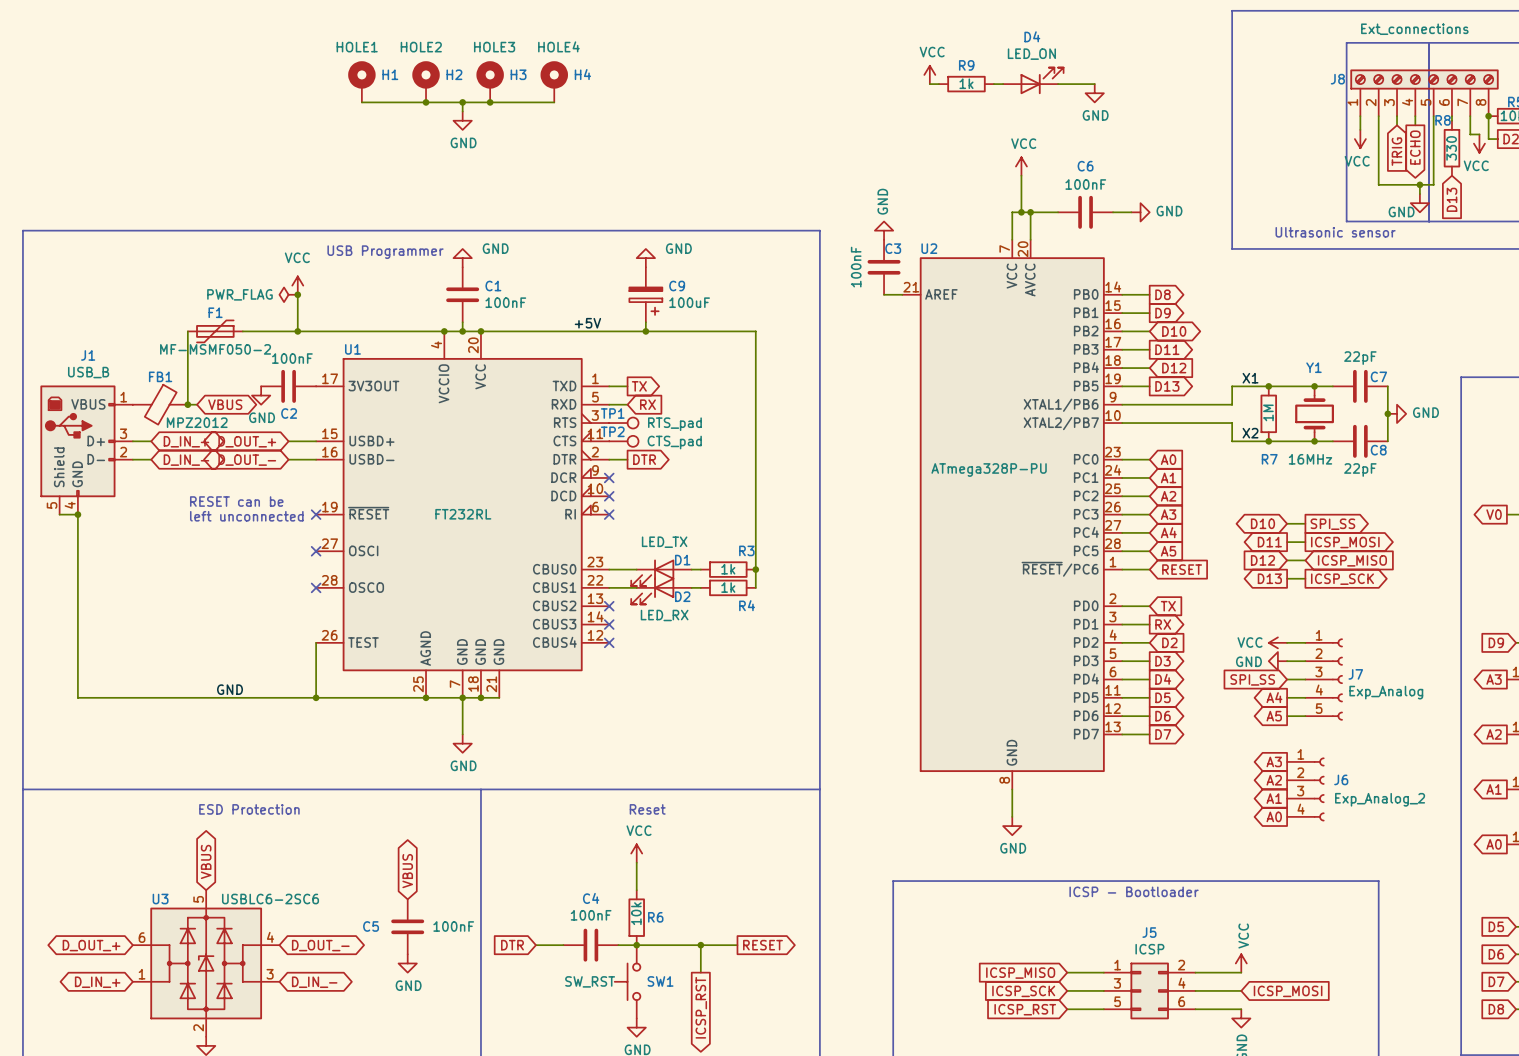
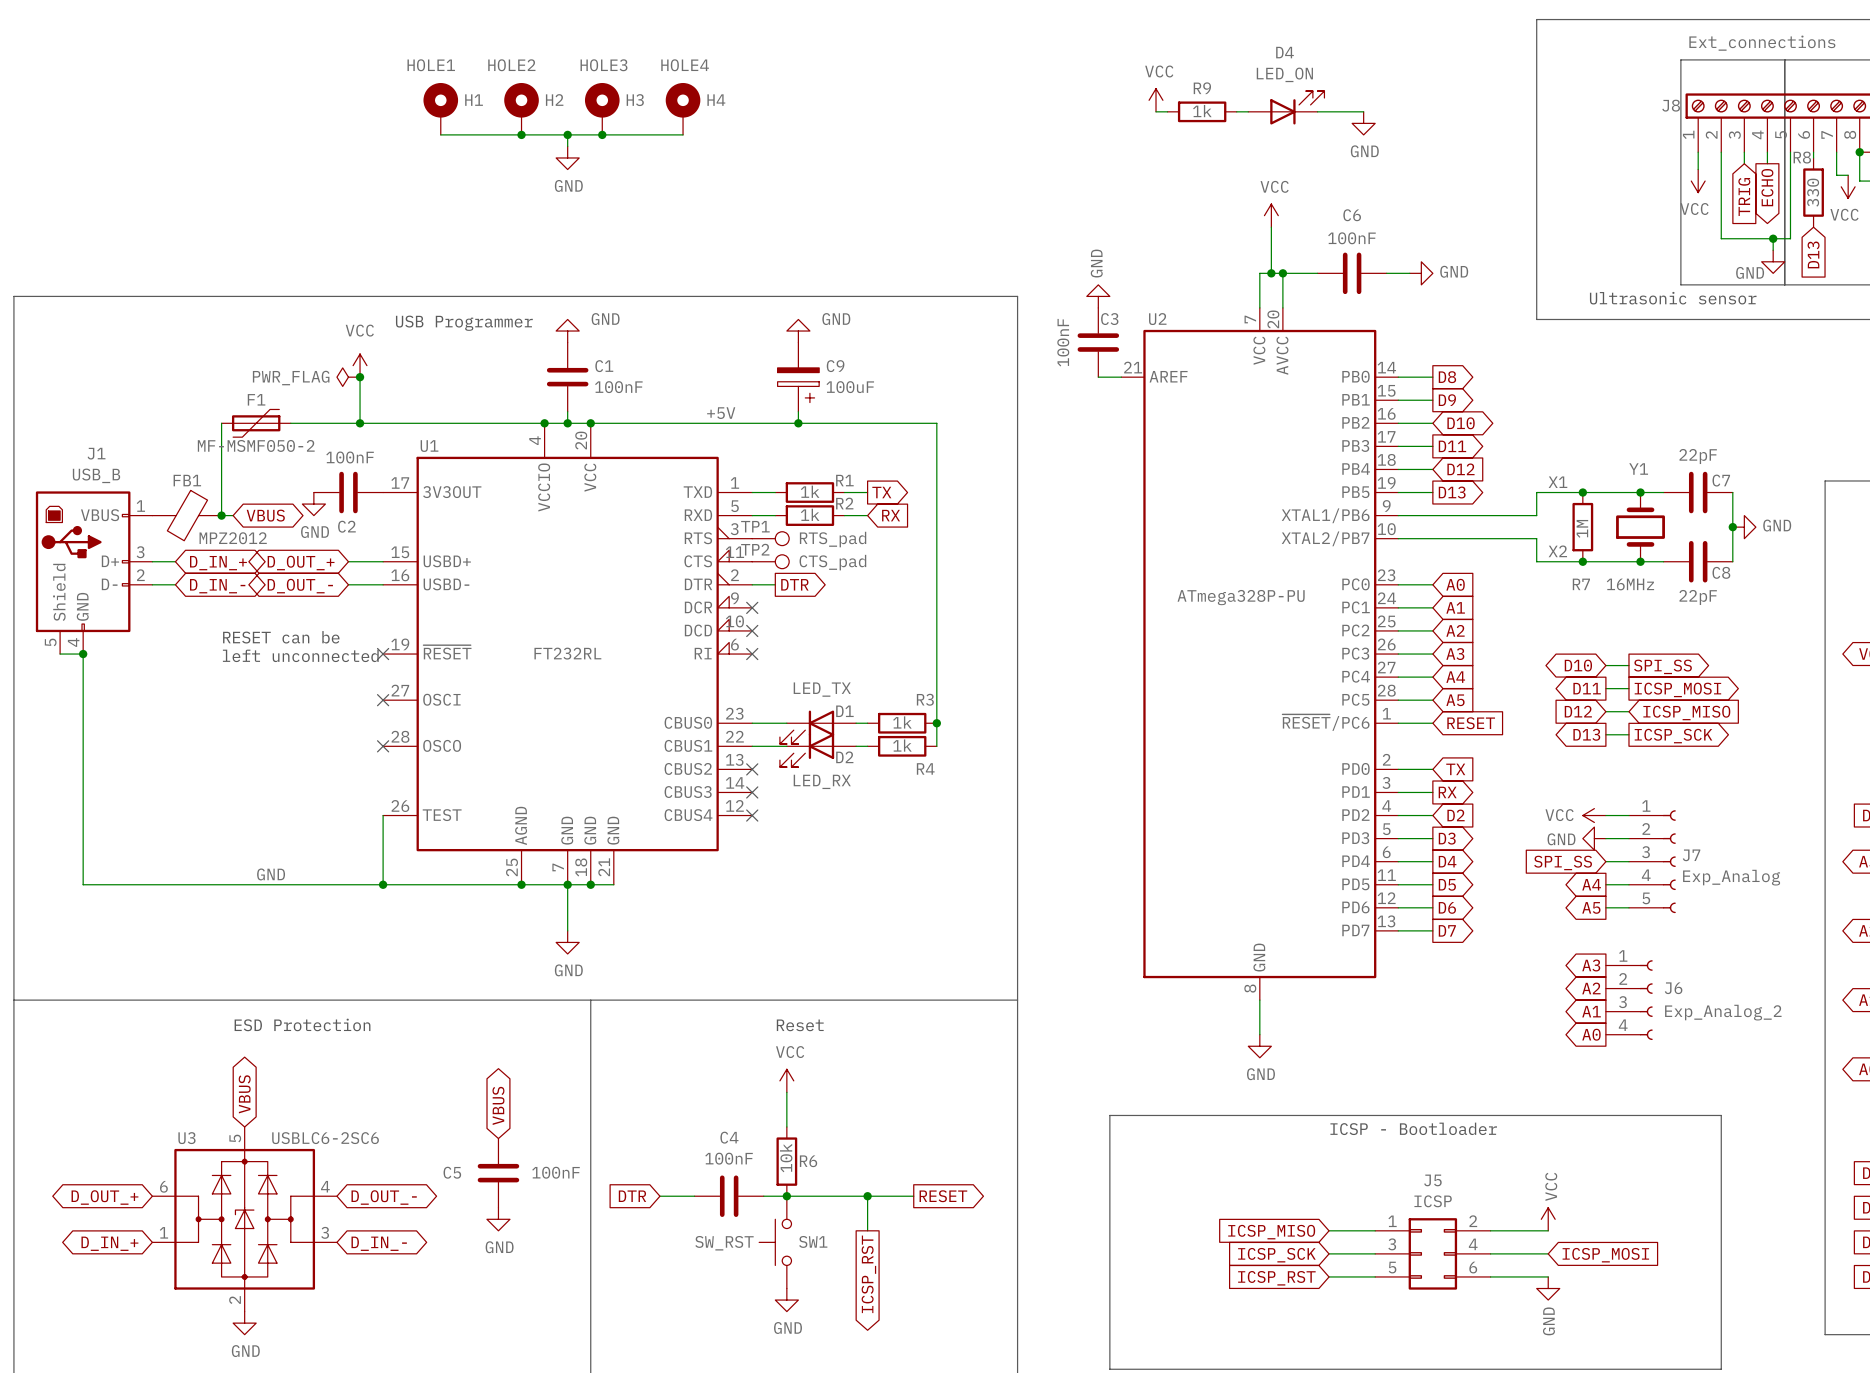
global label position: TX (639, 386) -> TX (881, 492)
R1: none -> 1k (809, 492)
wire: none -> (844, 492) (867, 492)
global label position: RX (647, 404) -> RX (891, 515)
R2: none -> 1k (809, 515)
wire: none -> (844, 515) (867, 515)

